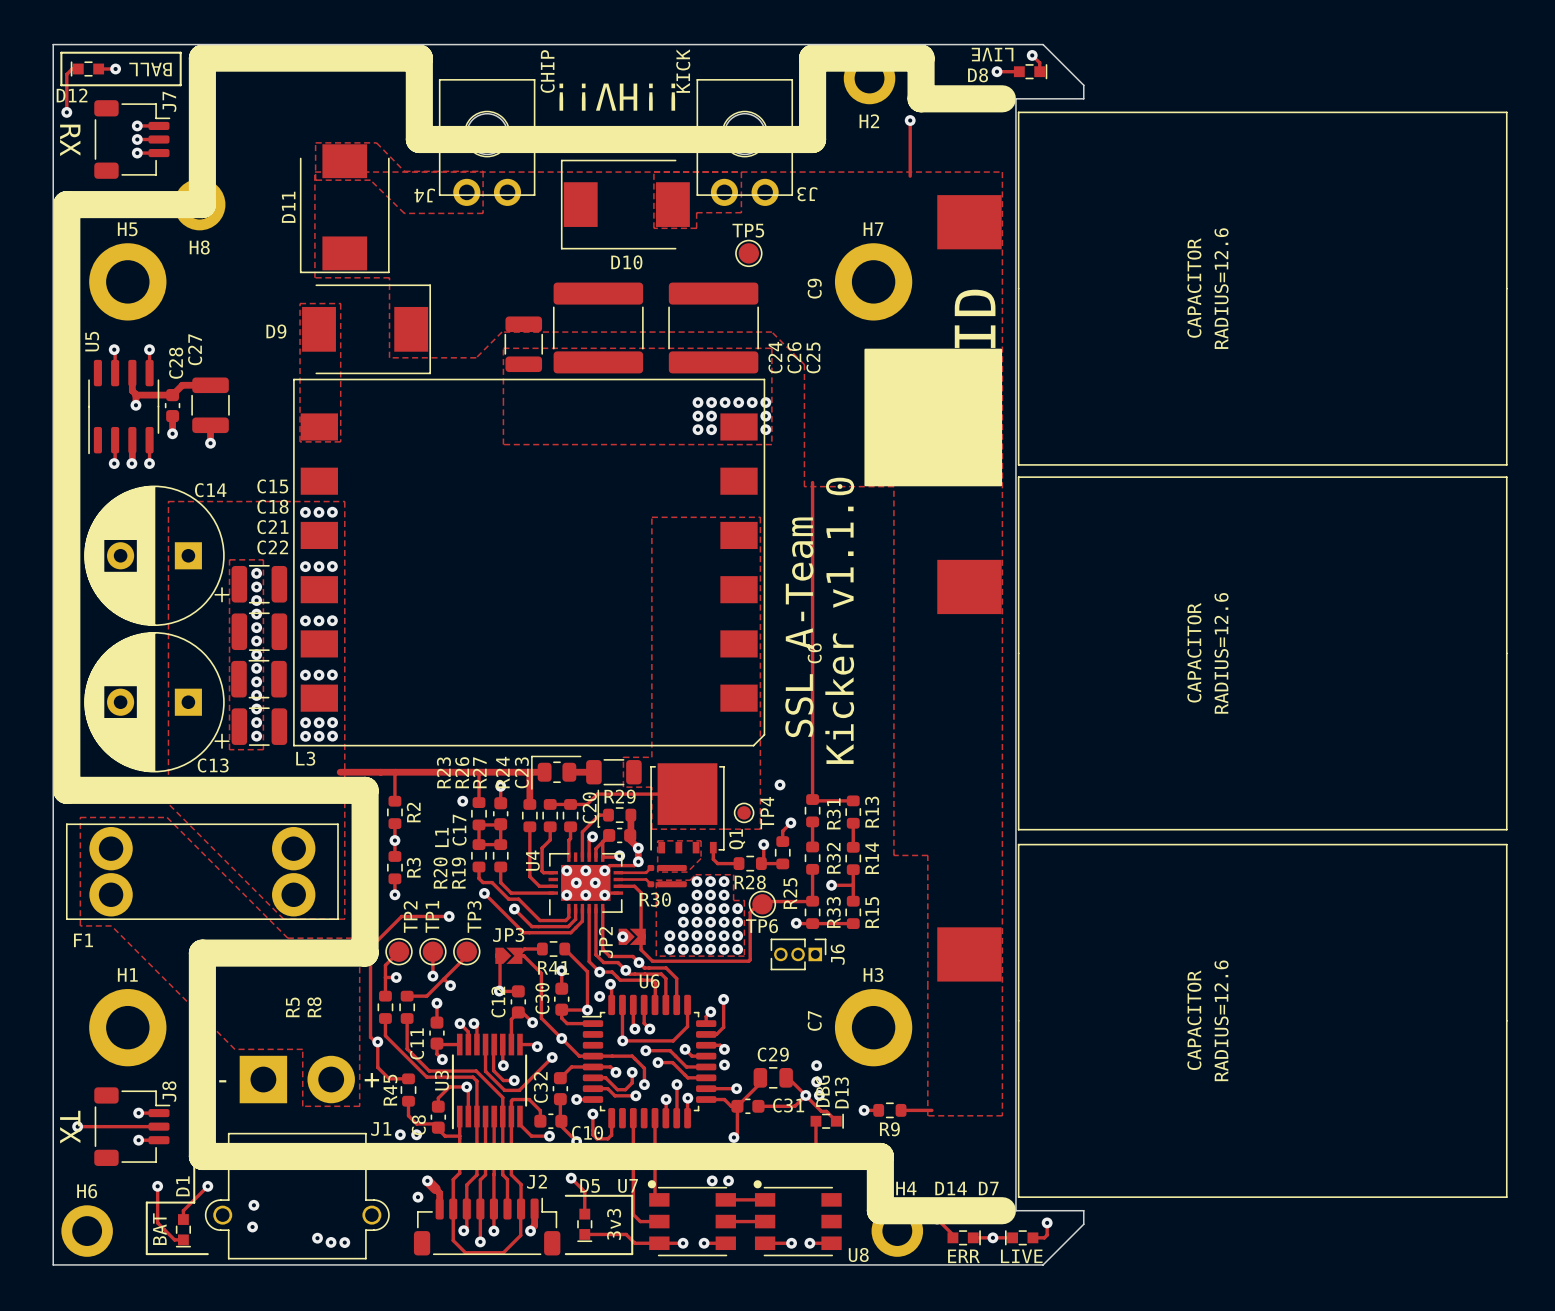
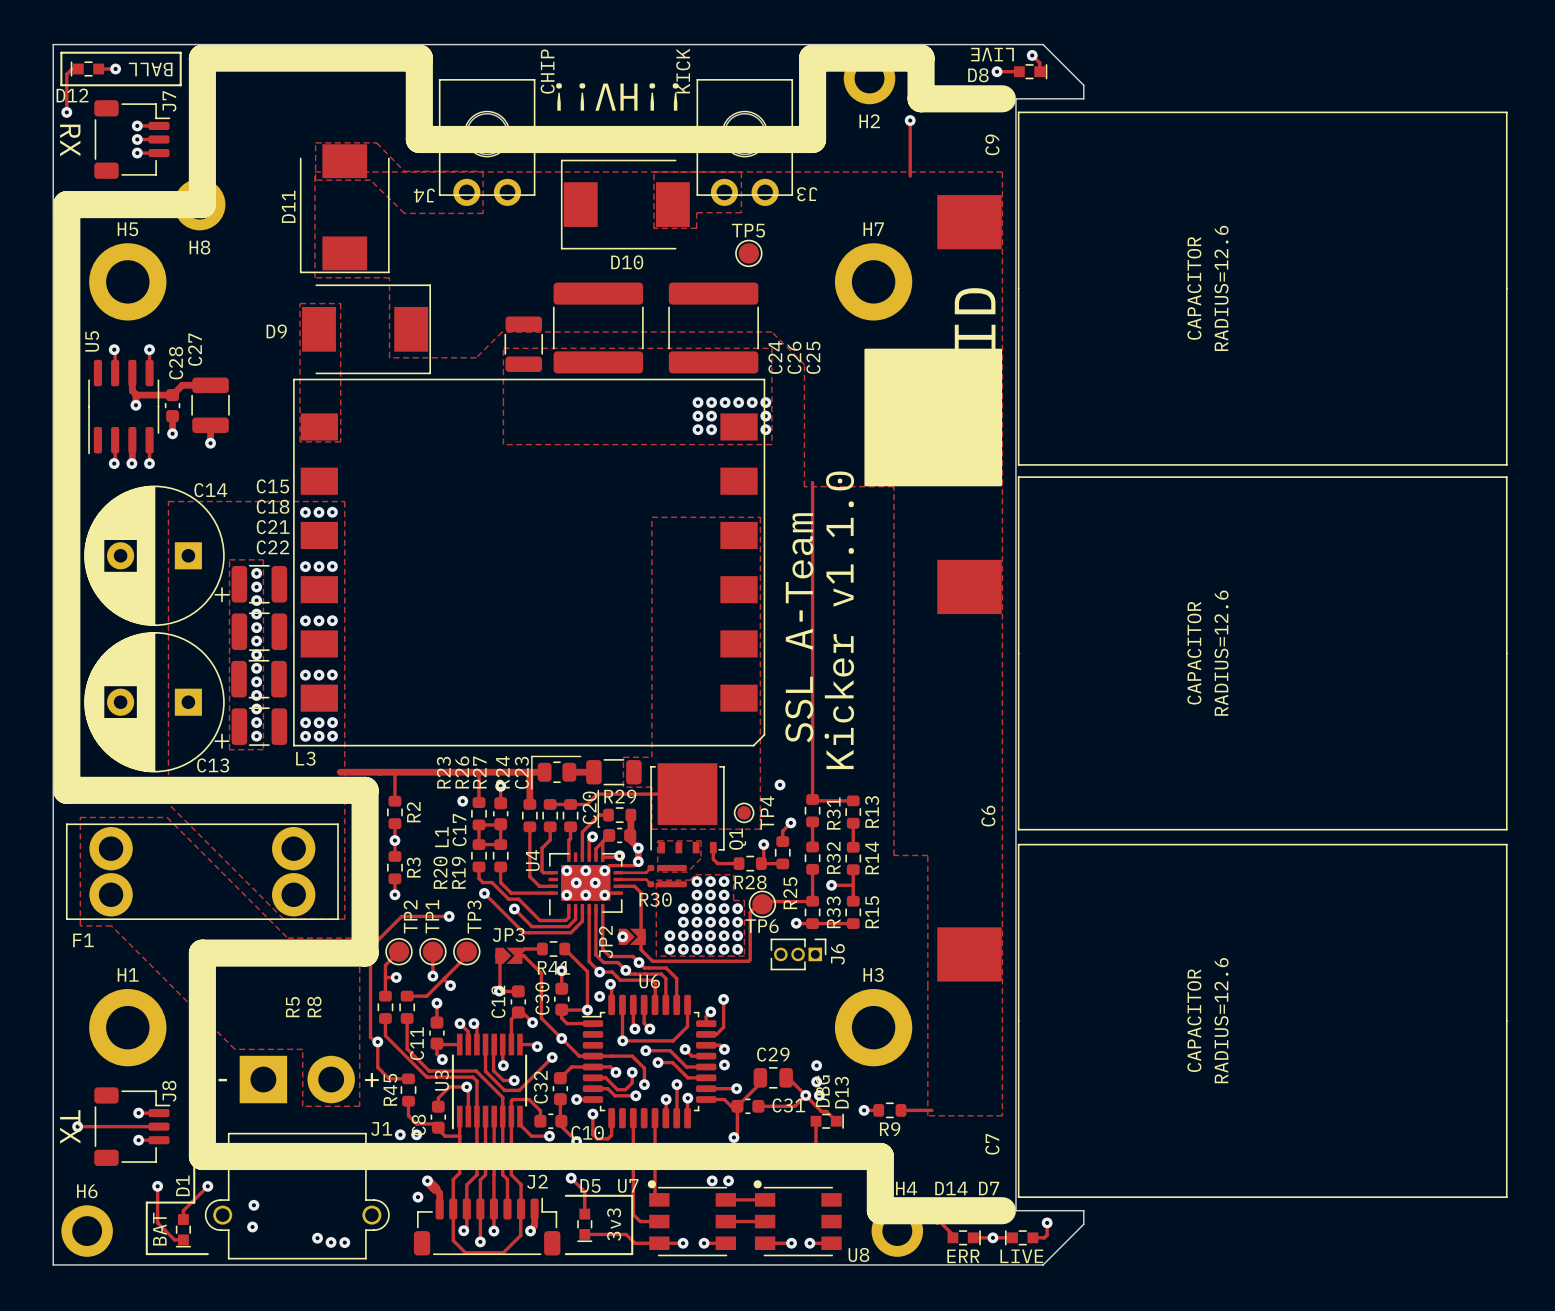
C9 name position: C9 (814, 288) -> C9 (992, 144)
C6 name position: C6 (814, 653) -> C6 (988, 816)
C7 name position: C7 (814, 1020) -> C7 (992, 1144)

